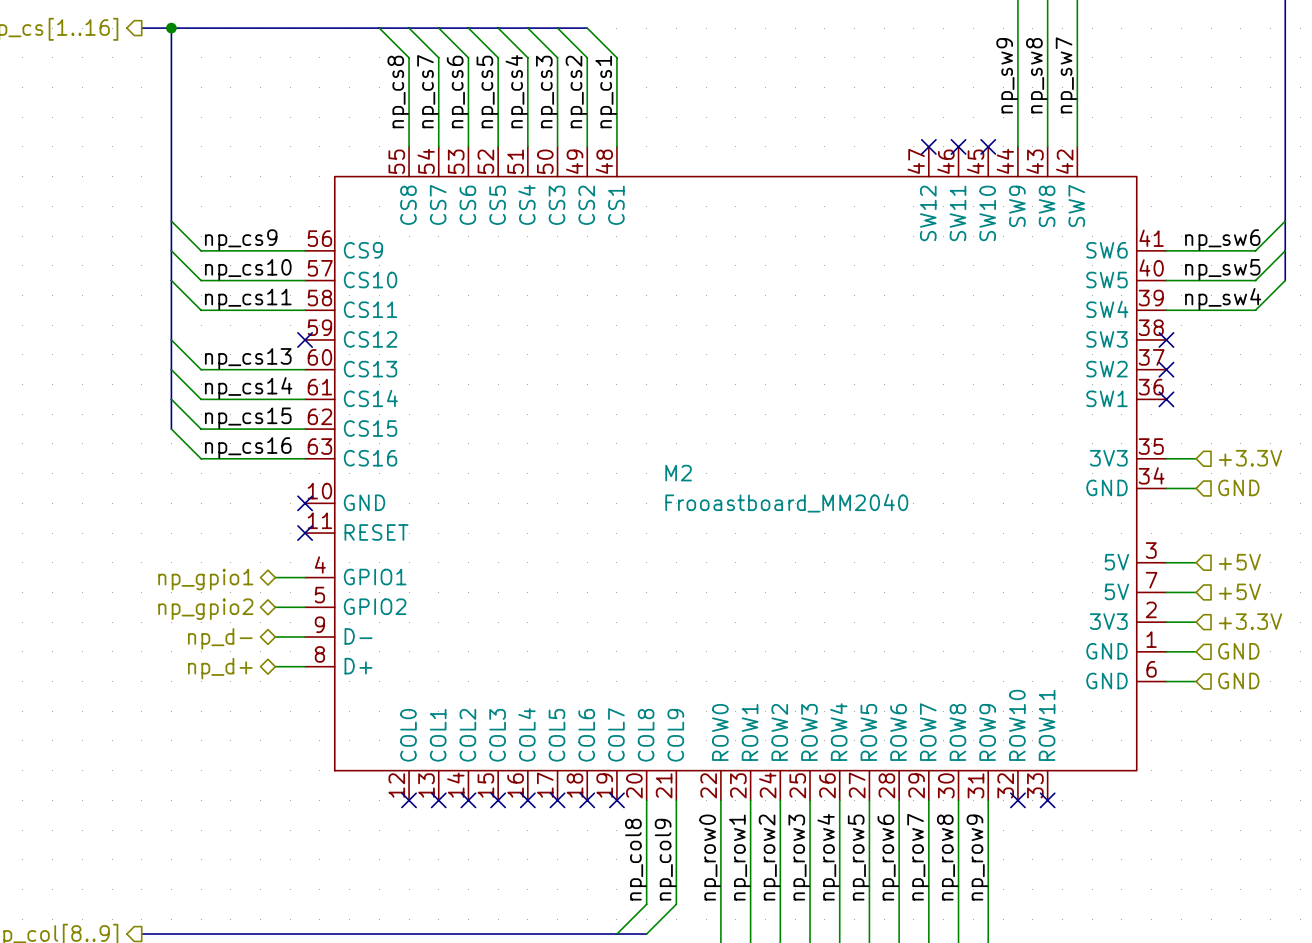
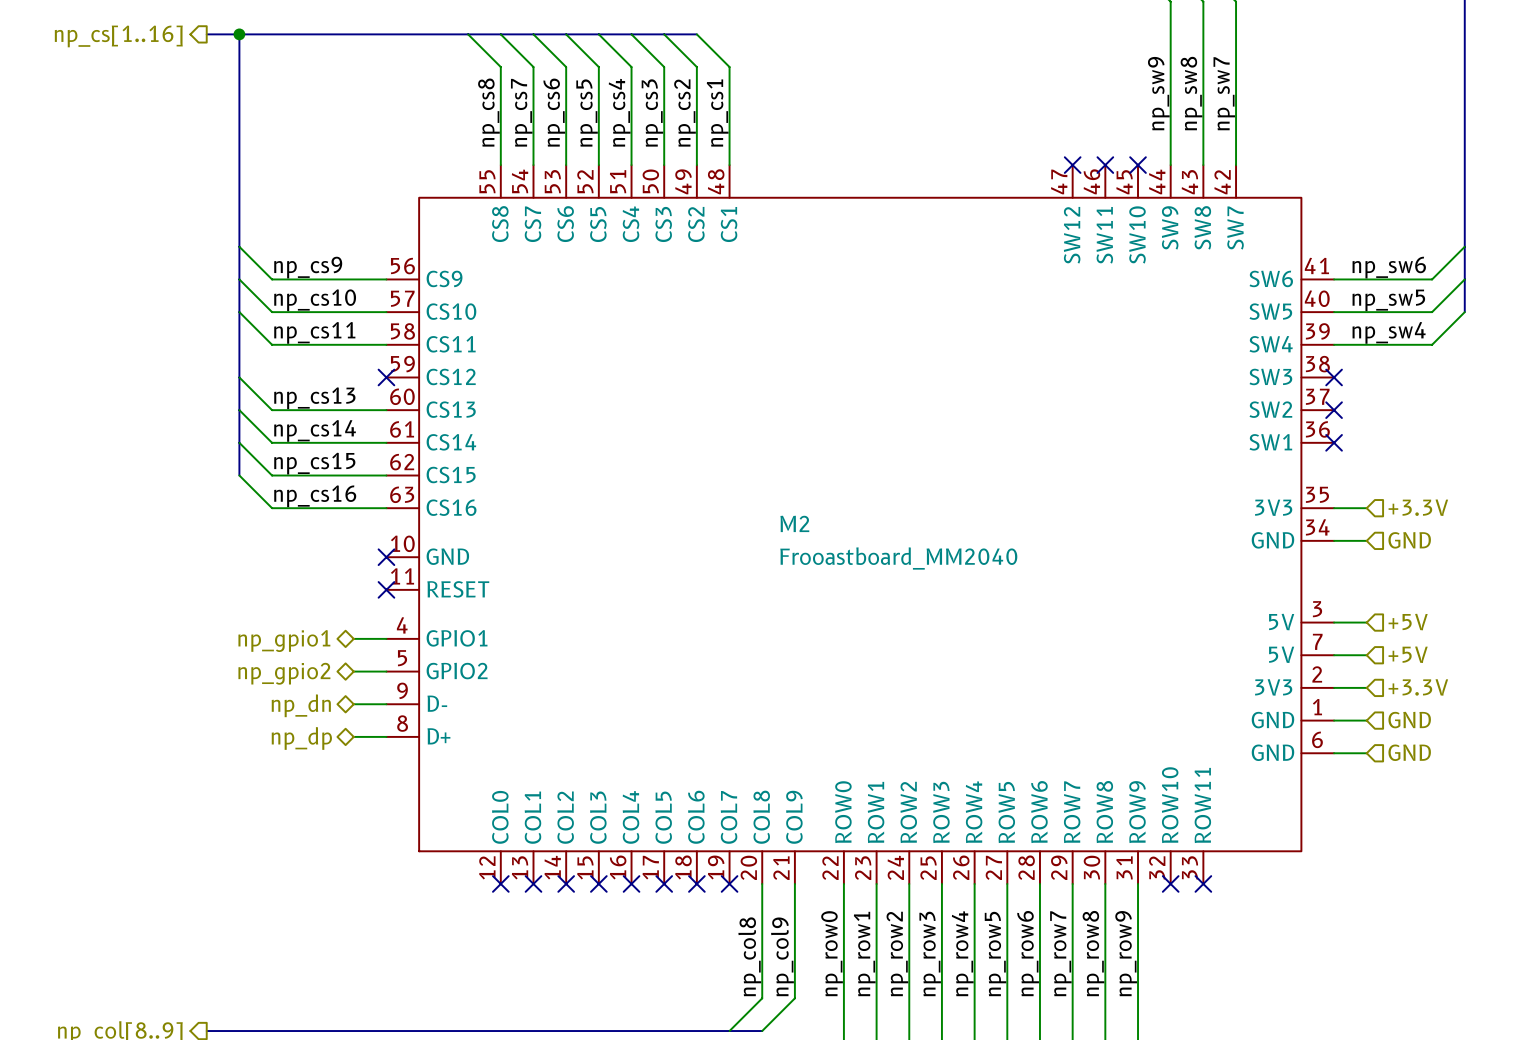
hierarchical label: np_d- (220, 638) -> np_dn (301, 705)
hierarchical label: np_d+ (220, 668) -> np_dp (301, 738)

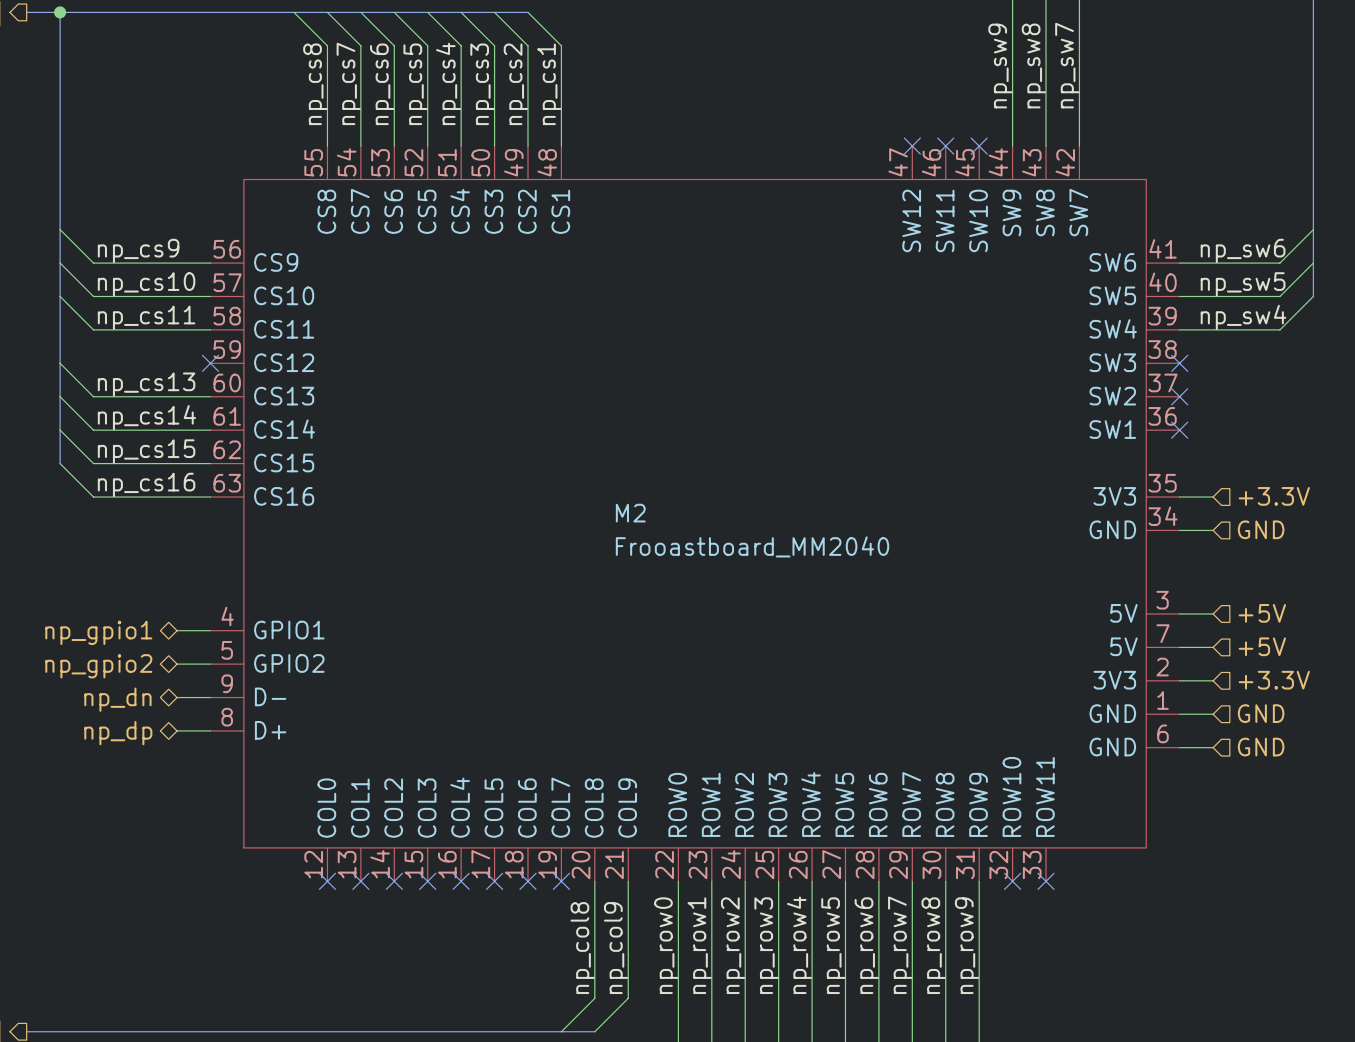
M2 symbol: [386, 165, 1335, 884] -> [210, 146, 1180, 882]
no-connect mark: (386, 557) -> none
no-connect mark: (386, 589) -> none

